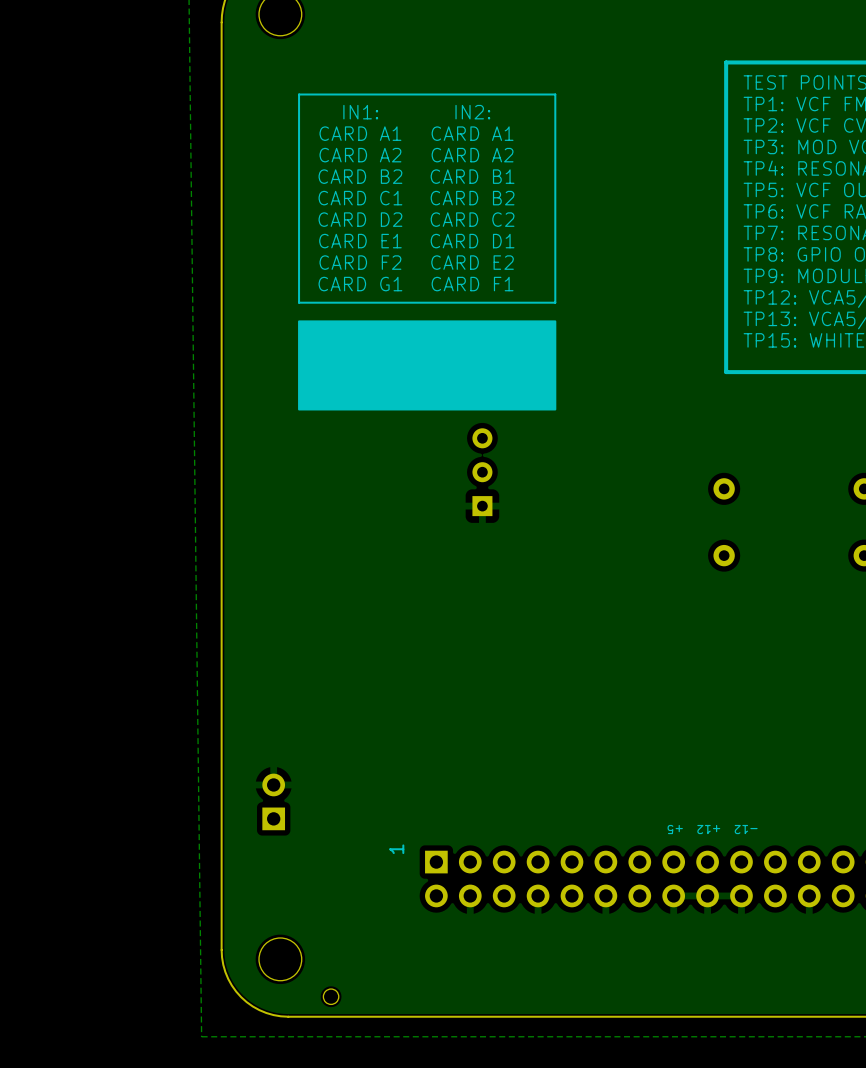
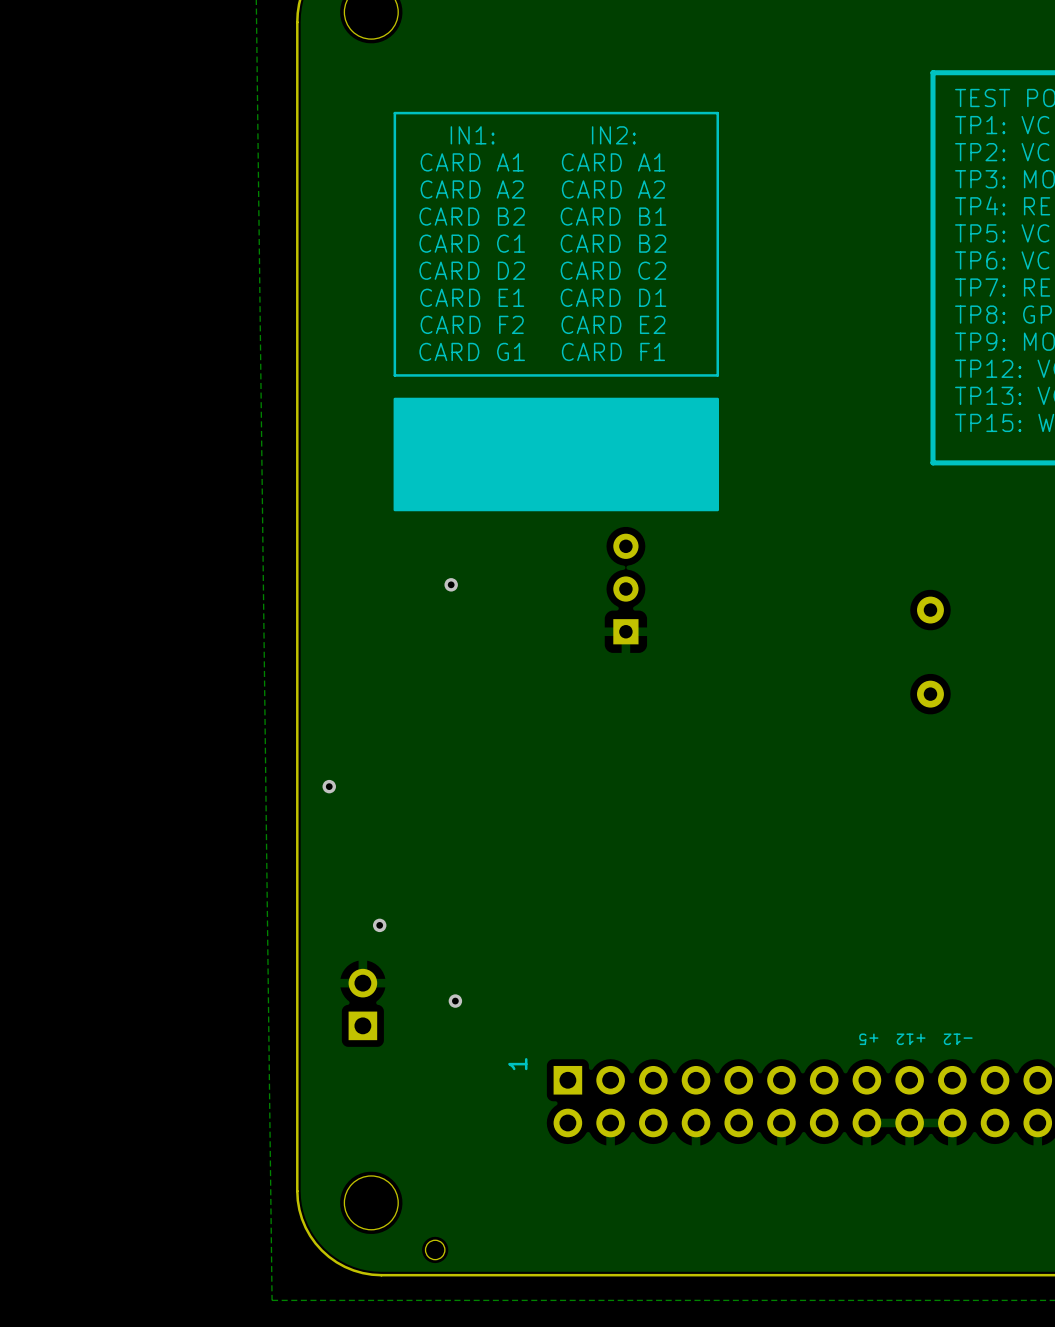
via: none -> (451, 584)
via: none -> (329, 786)
via: none -> (379, 925)
via: none -> (455, 1001)

